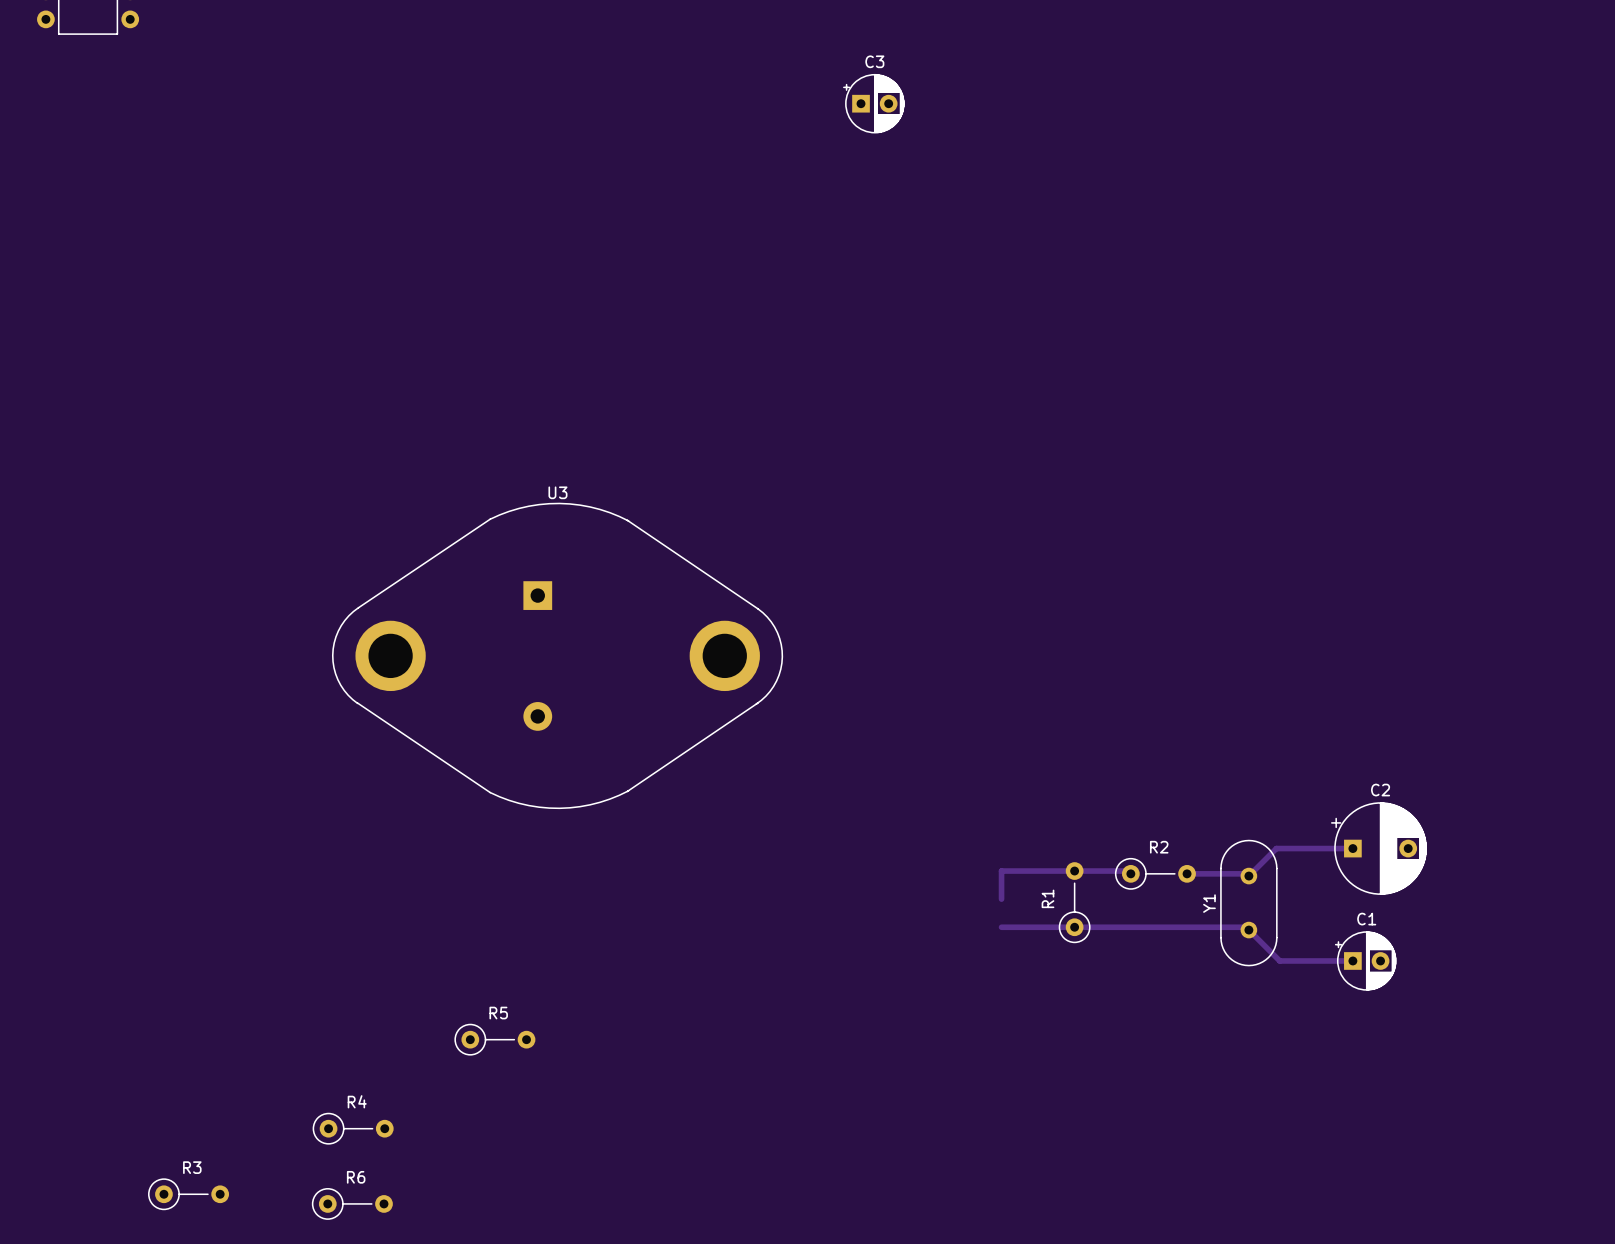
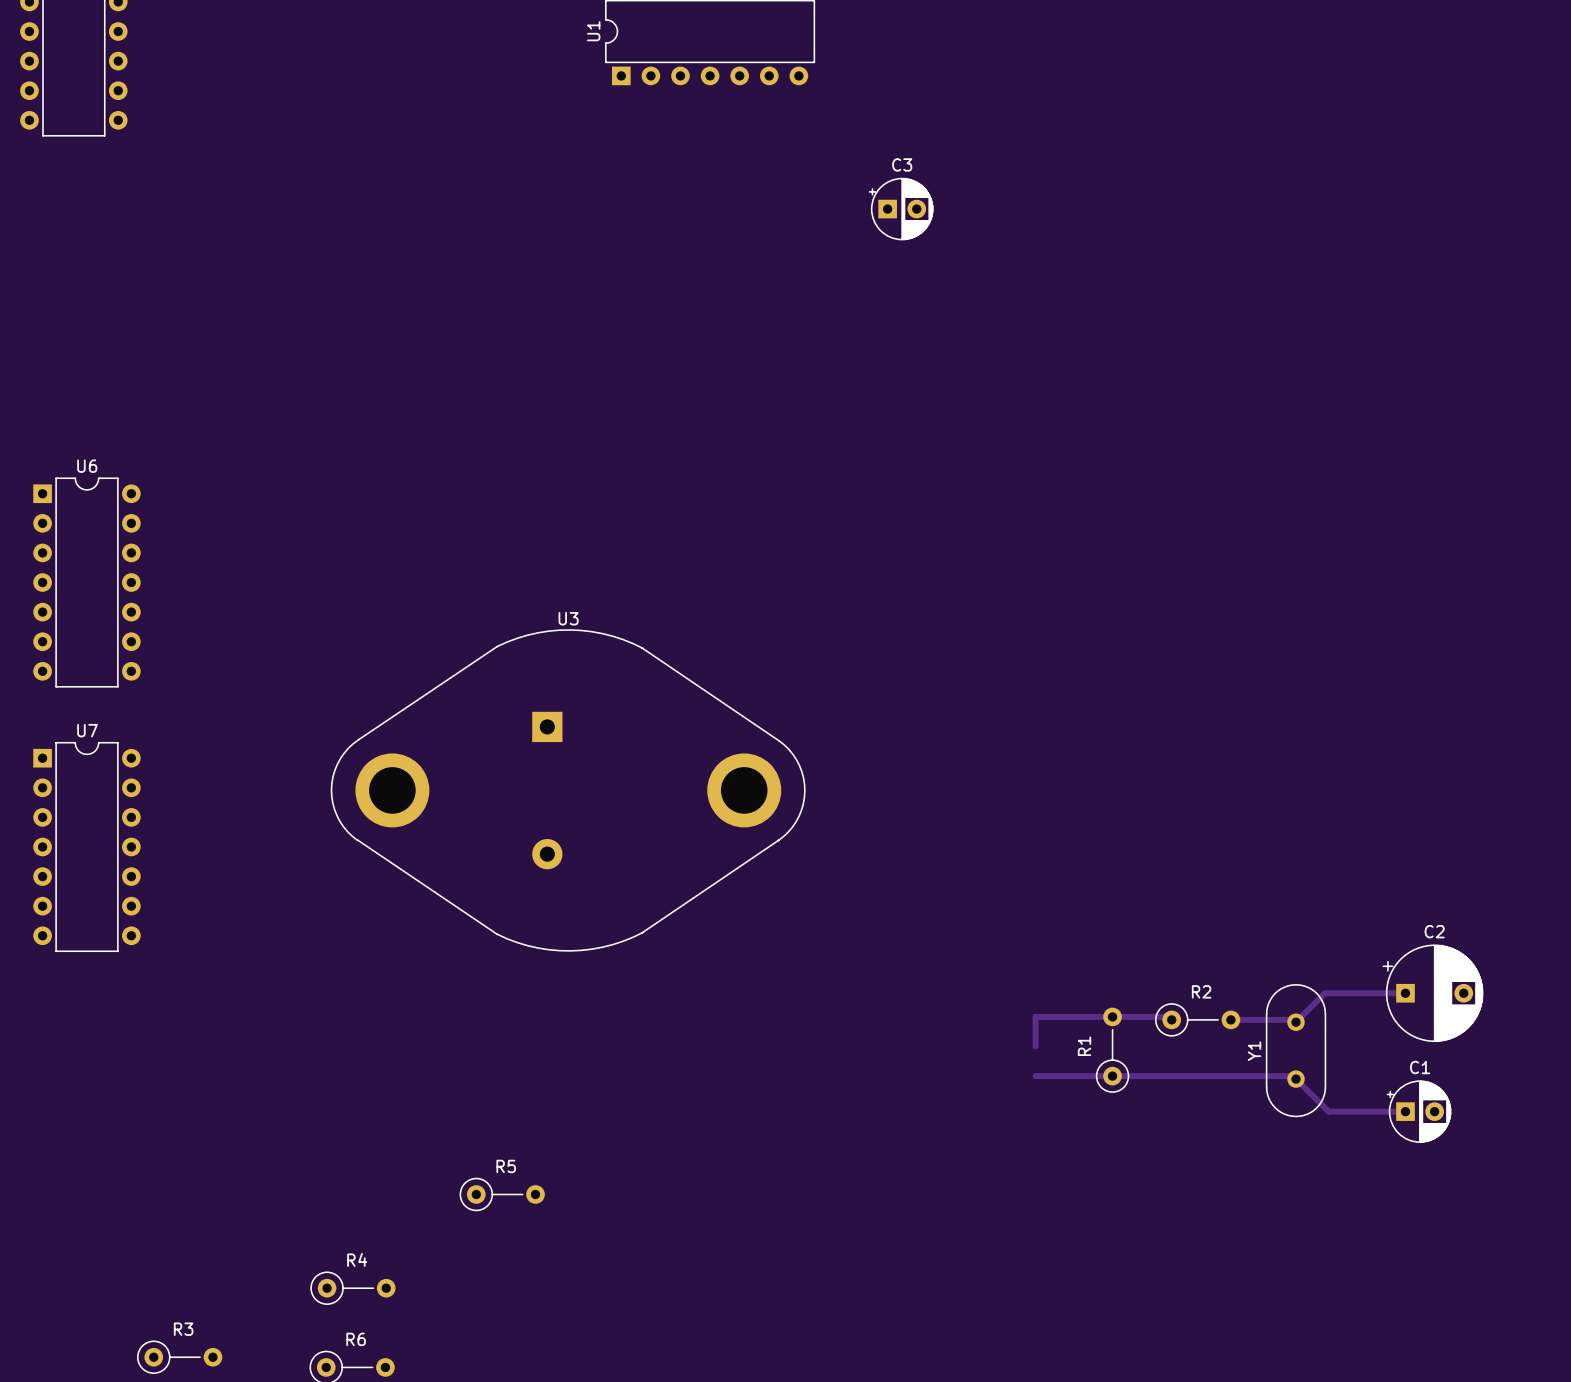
U6: none -> (86, 582)
U7: none -> (86, 846)

